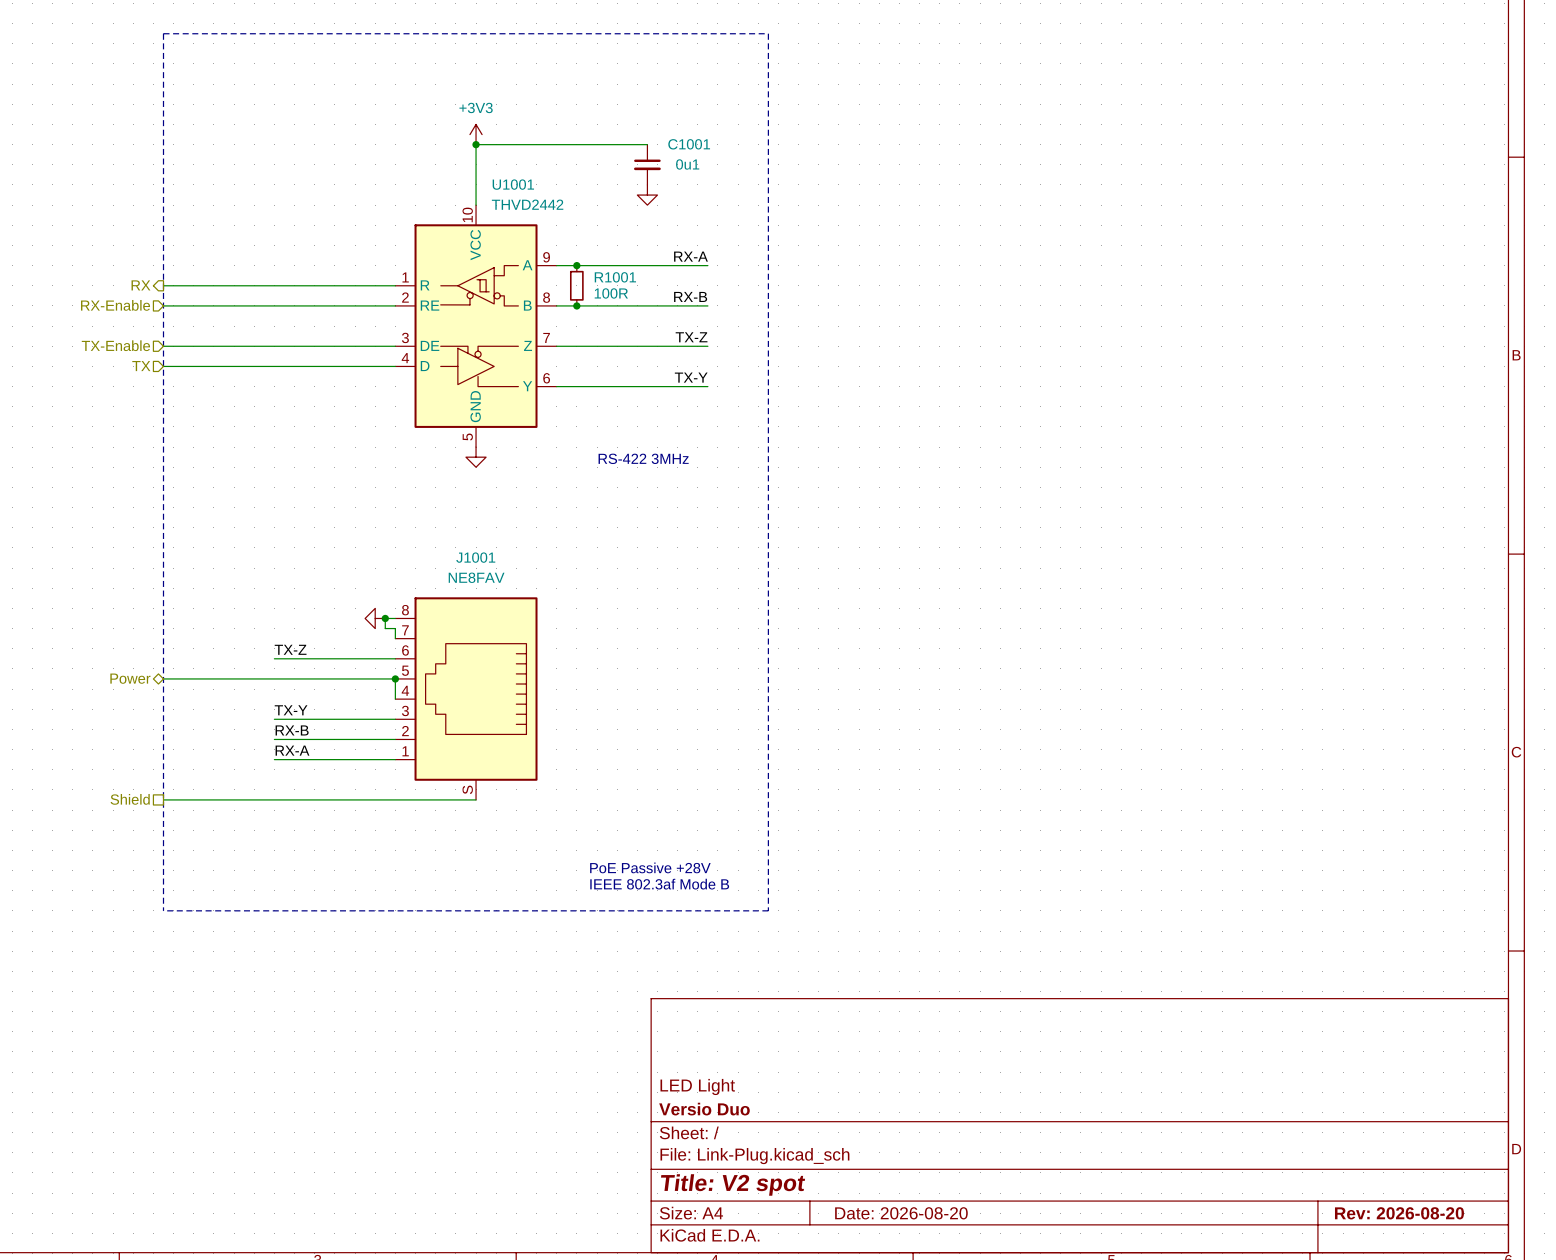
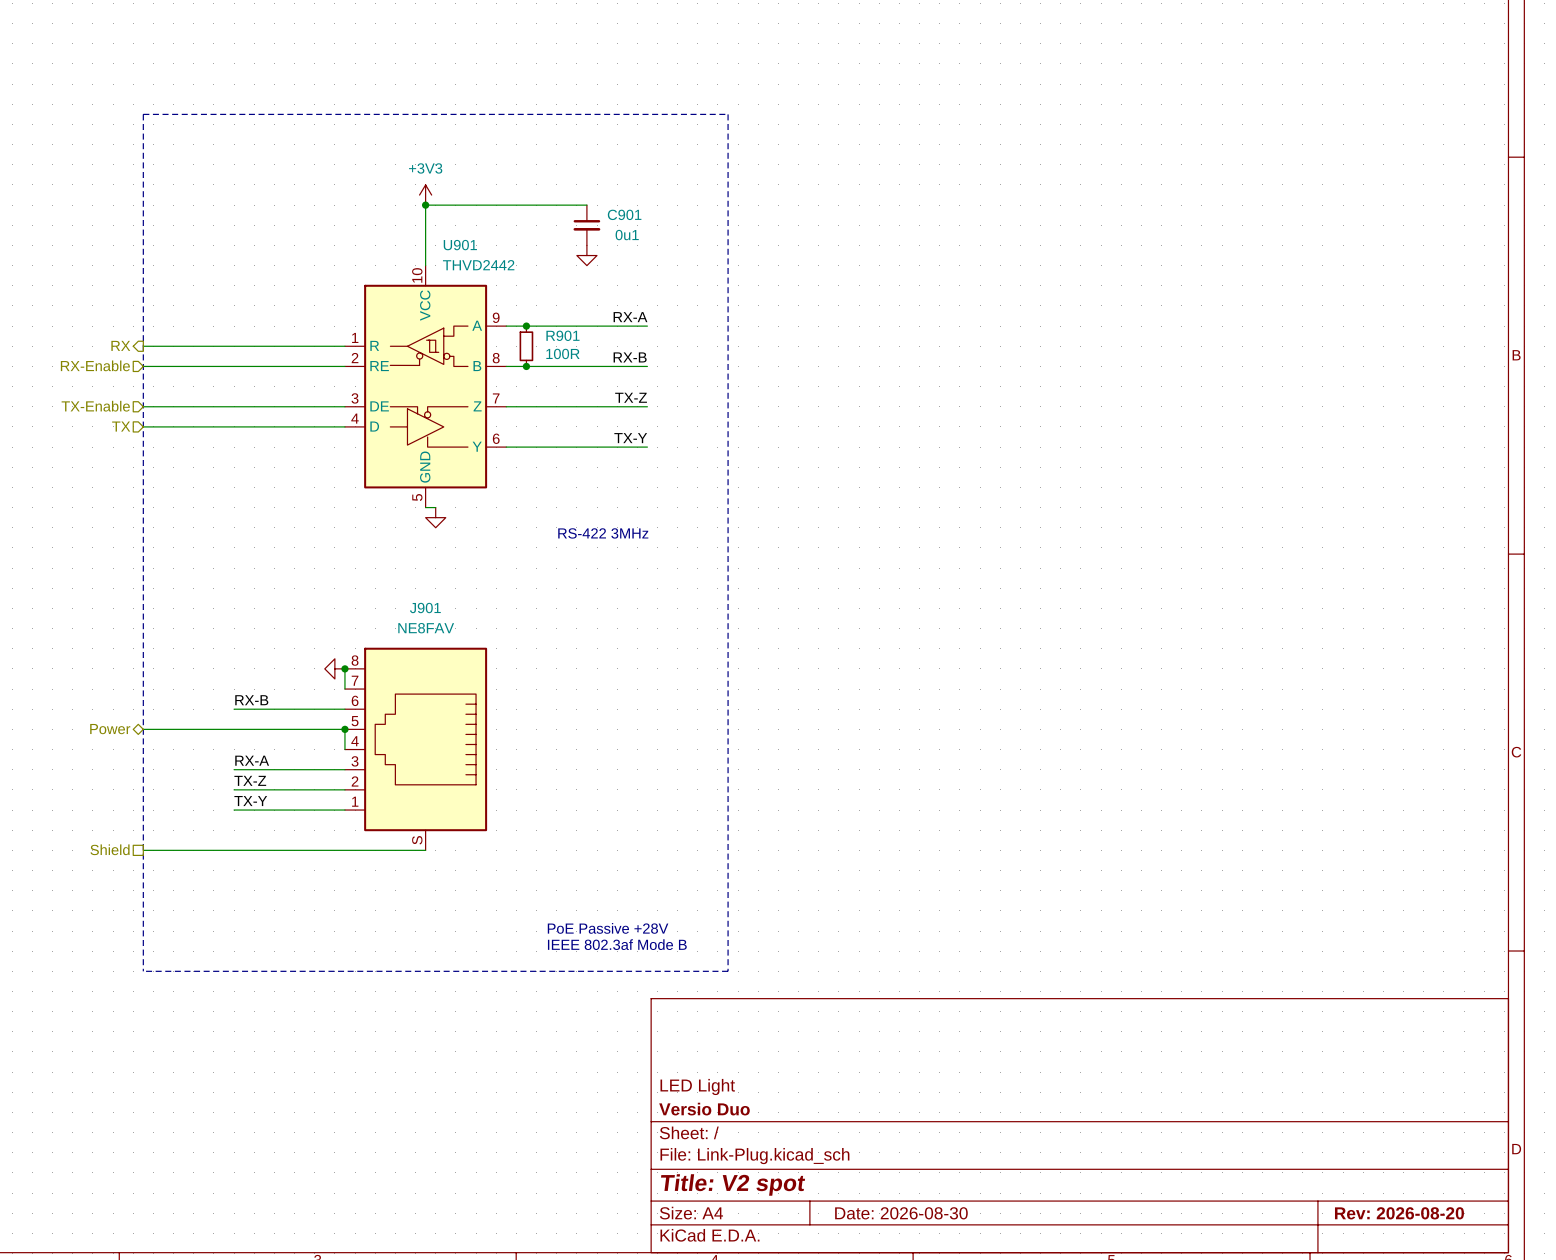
line: (163, 33) (163, 910) (768, 910) (768, 33) (163, 33) -> (143, 114) (143, 971) (728, 971) (728, 114) (143, 114)
power symbol position: +3V3 (476, 134) -> +3V3 (425, 195)
junction: (476, 144) -> none
wire: (647, 144) (476, 144) (476, 205) -> none
C1001: 0u1 (647, 164) -> none
power symbol position: (647, 195) -> (586, 255)
junction: none -> (425, 205)
wire: none -> (586, 205) (425, 205) (425, 265)
C901: none -> 0u1 (586, 225)
label position: RX-A (690, 256) -> RX-A (630, 317)
wire: (556, 265) (707, 265) -> none
junction: (576, 265) -> none
hierarchical label position: RX (140, 285) -> RX (120, 345)
wire: (163, 285) (395, 285) -> none
R1001: 100R (576, 285) -> none
label position: RX-B (690, 296) -> RX-B (630, 357)
hierarchical label position: RX-Enable (115, 305) -> RX-Enable (95, 365)
wire: (163, 305) (395, 305) -> none
wire: (556, 305) (707, 305) -> none
junction: (576, 305) -> none
U1001: THVD2442 (476, 326) -> none
wire: none -> (506, 326) (647, 326)
junction: none -> (526, 326)
label position: TX-Z (691, 337) -> TX-Z (631, 397)
hierarchical label position: TX-Enable (115, 345) -> TX-Enable (95, 406)
wire: none -> (143, 346) (163, 346)
R901: none -> 100R (526, 346)
wire: (556, 346) (707, 346) -> none
hierarchical label position: TX (141, 366) -> TX (121, 426)
wire: none -> (143, 366) (163, 366)
wire: none -> (506, 366) (647, 366)
junction: none -> (526, 366)
label position: TX-Y (691, 377) -> TX-Y (630, 438)
U901: none -> THVD2442 (425, 386)
wire: (556, 386) (707, 386) -> none
wire: none -> (143, 406) (344, 406)
wire: none -> (506, 406) (647, 406)
wire: none -> (143, 426) (344, 426)
wire: none -> (506, 447) (647, 447)
power symbol: (476, 457) -> none
text position: RS-422 3MHz (643, 458) -> RS-422 3MHz (603, 533)
wire: none -> (425, 507) (435, 507)
power symbol: none -> (435, 517)
power symbol: (375, 618) -> none
junction: (385, 618) -> none
wire: (395, 618) (385, 618) (385, 628) (395, 628) (395, 638) -> none
label position: TX-Z (290, 649) -> TX-Z (250, 780)
wire: (274, 658) (395, 658) -> none
power symbol: none -> (334, 668)
wire: none -> (344, 668) (344, 689)
junction: none -> (344, 668)
hierarchical label position: Power (130, 678) -> Power (110, 729)
wire: (163, 678) (395, 678) (395, 699) -> none
junction: (395, 678) -> none
J1001: NE8FAV (466, 698) -> none
wire: none -> (234, 709) (344, 709)
label position: TX-Y (291, 710) -> TX-Y (250, 801)
wire: (274, 719) (395, 719) -> none
wire: none -> (143, 729) (344, 729) (344, 749)
junction: none -> (344, 729)
label position: RX-B (292, 730) -> RX-B (251, 700)
wire: (274, 739) (395, 739) -> none
J901: none -> NE8FAV (416, 749)
label position: RX-A (292, 750) -> RX-A (252, 760)
wire: (274, 759) (395, 759) -> none
wire: none -> (234, 769) (344, 769)
wire: none -> (234, 789) (344, 789)
hierarchical label position: Shield (130, 799) -> Shield (110, 849)
wire: (163, 799) (476, 799) -> none
wire: none -> (234, 810) (344, 810)
wire: none -> (143, 850) (425, 850)
text position: PoE Passive +28V (650, 867) -> PoE Passive +28V (608, 928)
text position: IEEE 802.3af Mode B (659, 884) -> IEEE 802.3af Mode B (617, 944)
title block: Date: 2026-08-20 (901, 1213) -> Date: 2026-08-30 (901, 1213)

